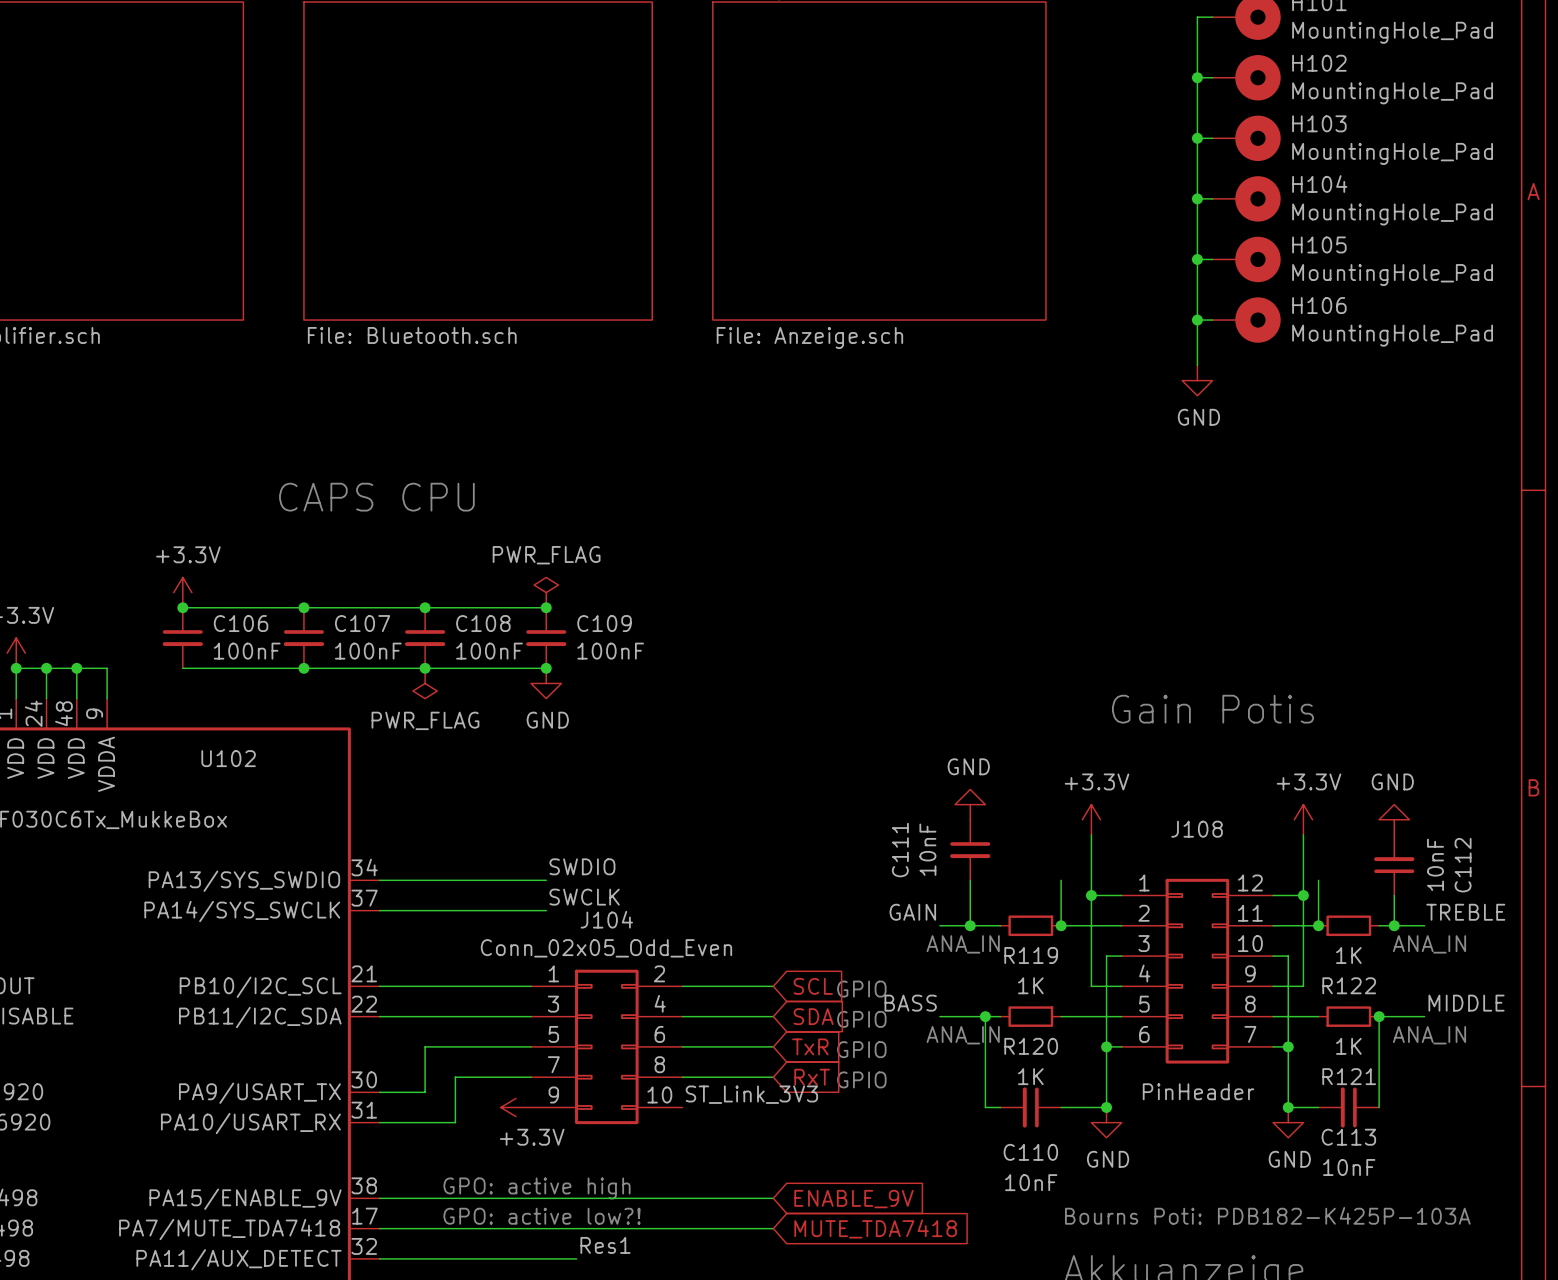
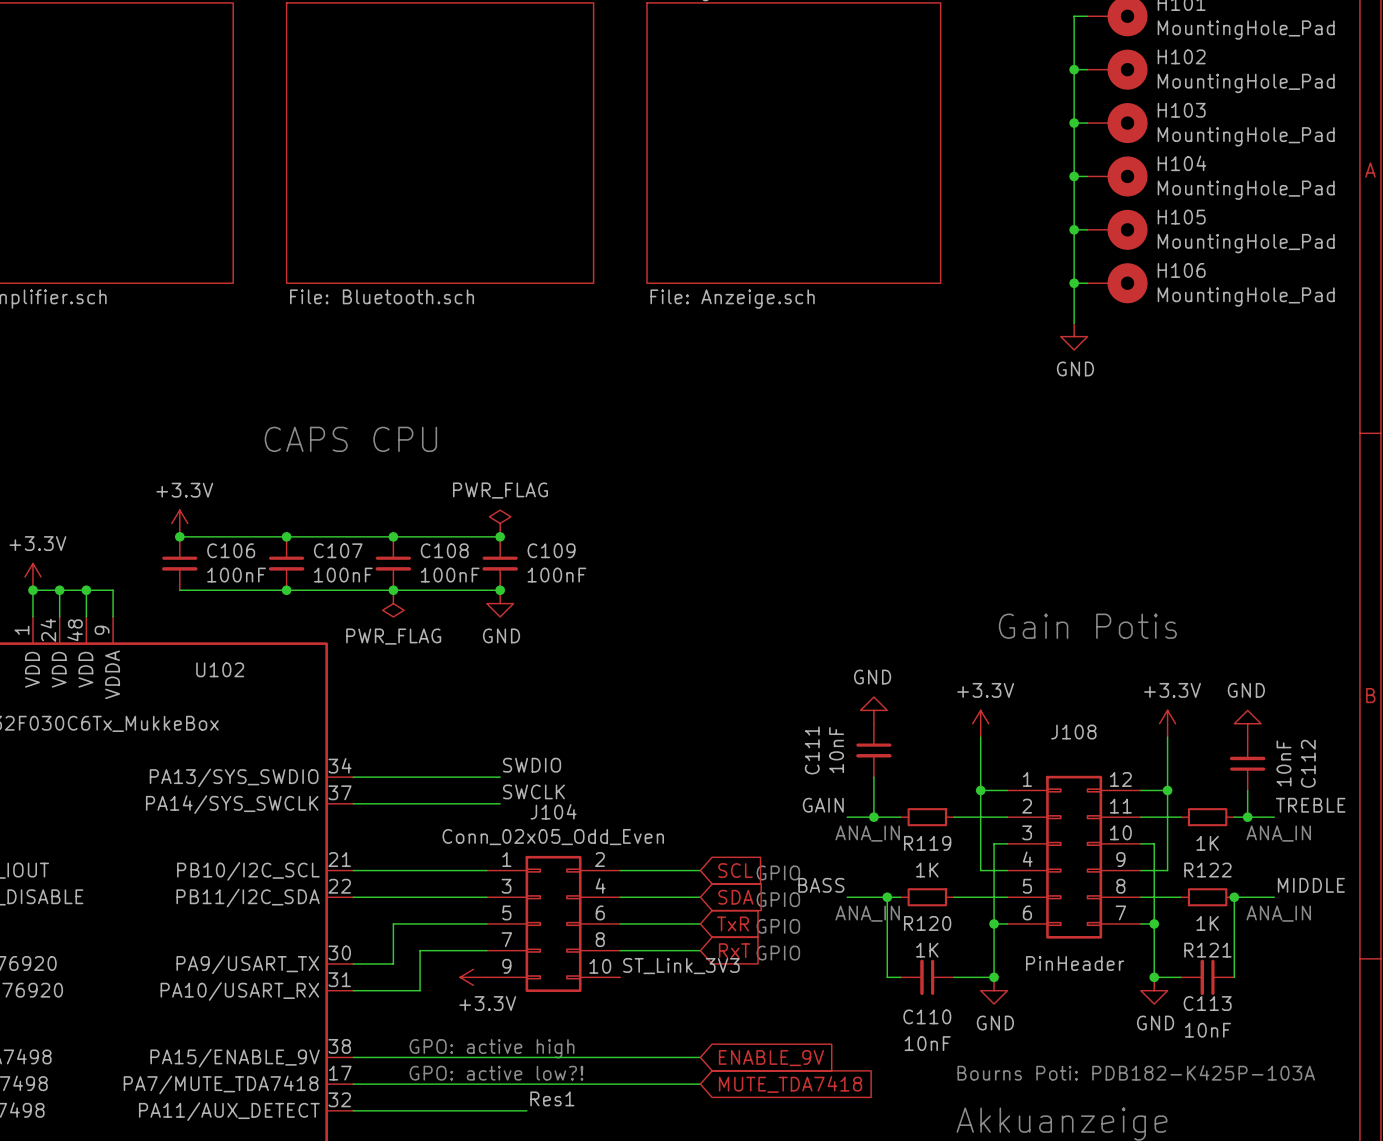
wire: (1061, 880) (1061, 925) -> none
wire: (1318, 880) (1318, 925) -> none
junction: (1061, 925) -> none
junction: (1318, 925) -> none

